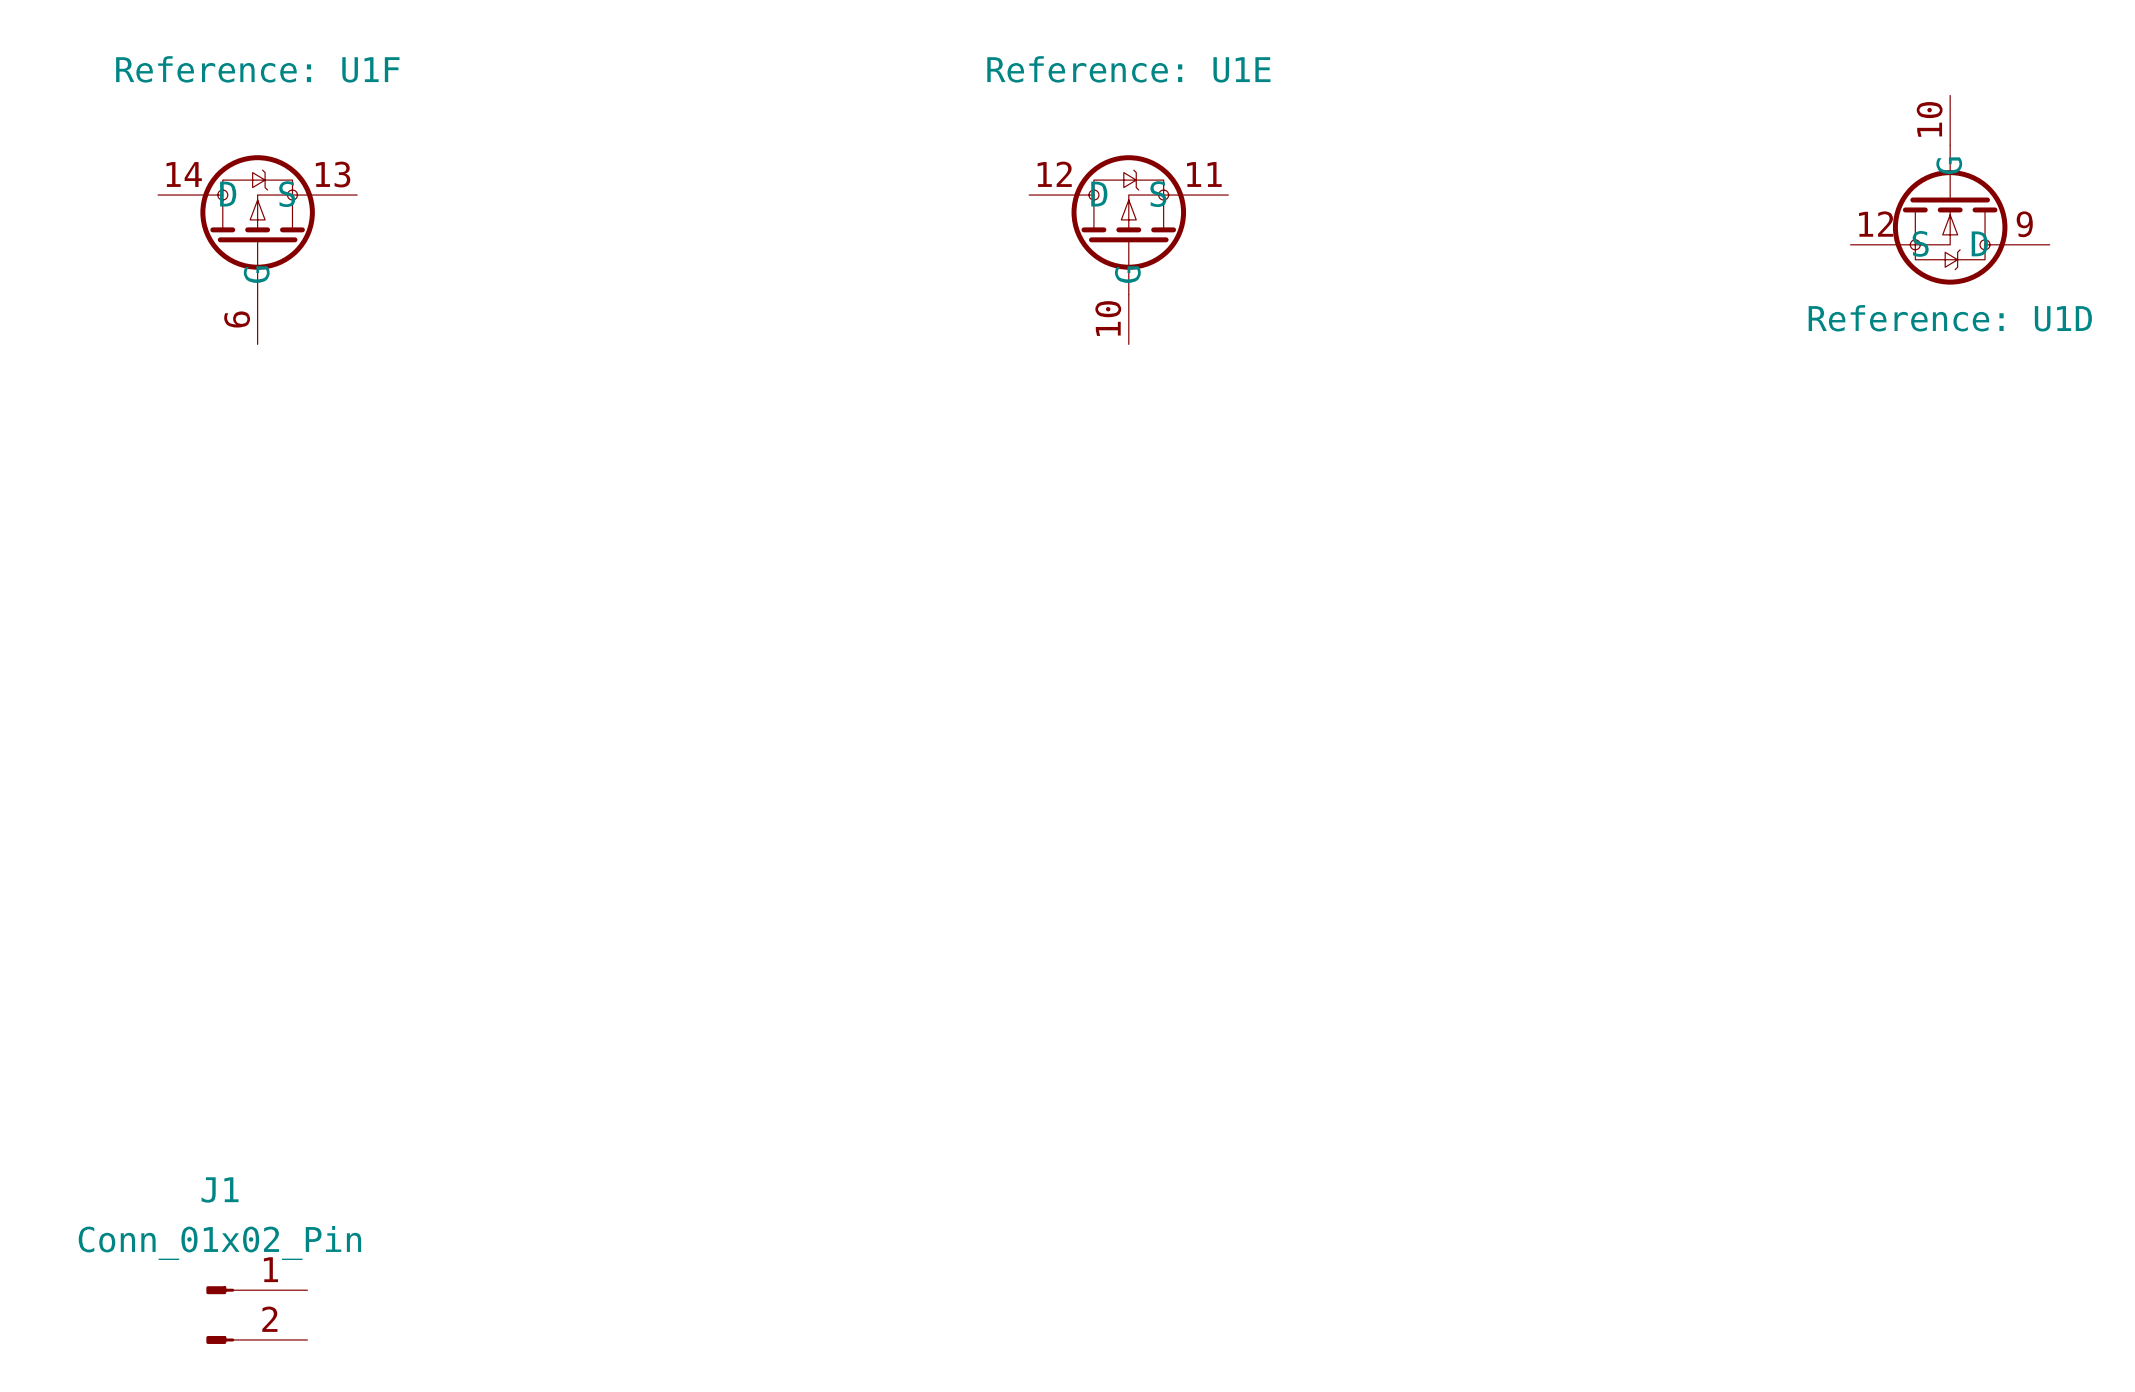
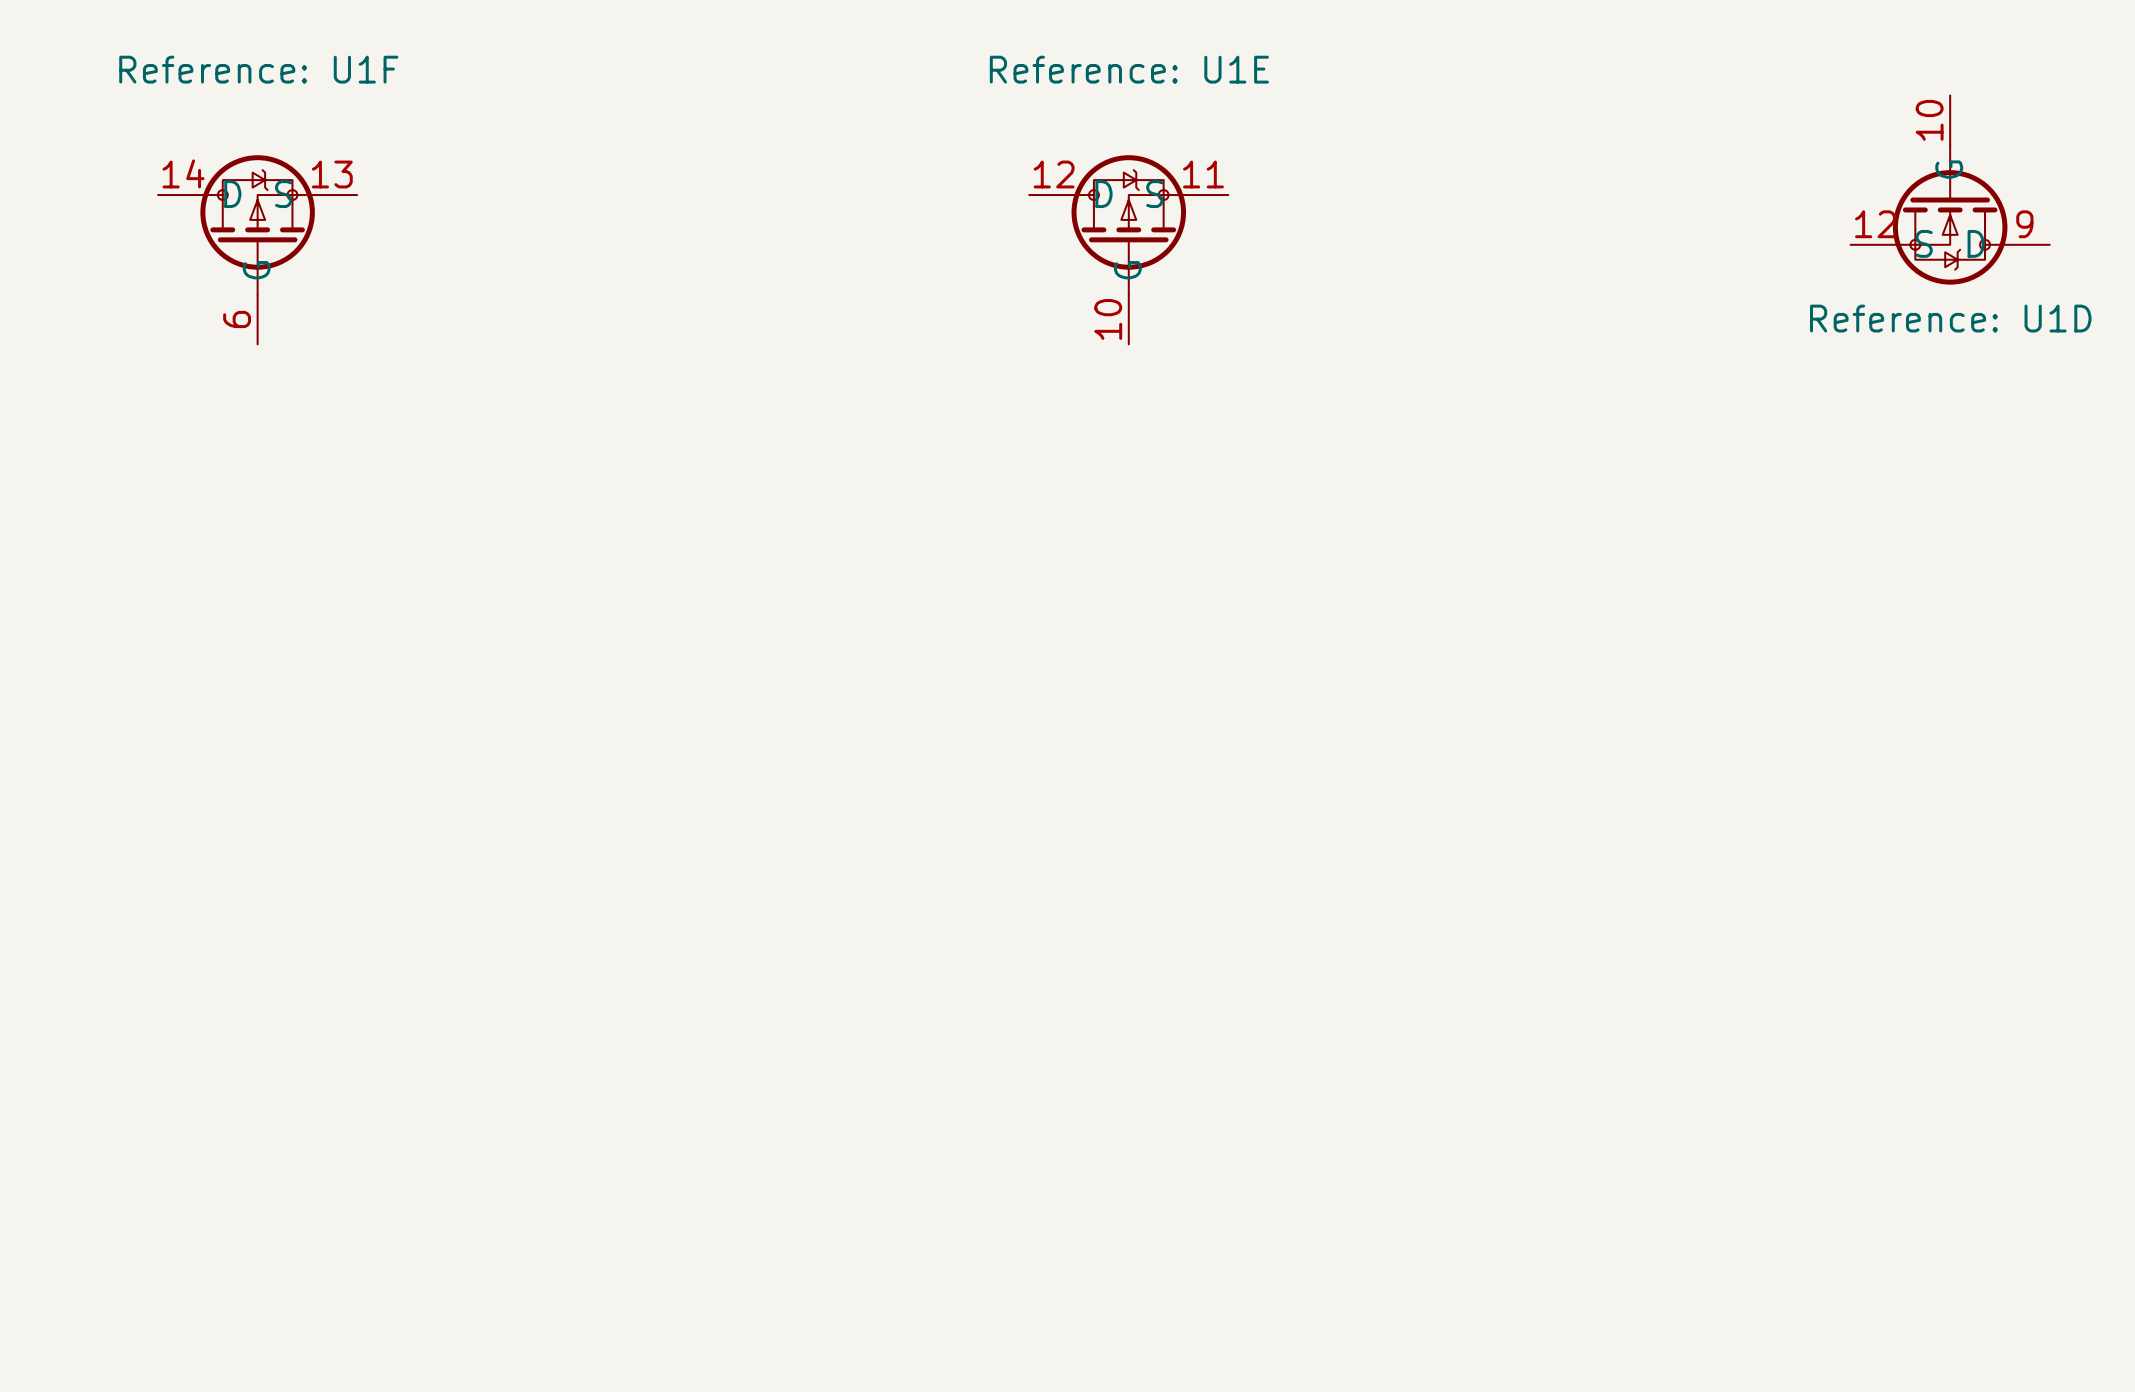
J1: Conn_01x02_Pin (256, 1315) -> none

